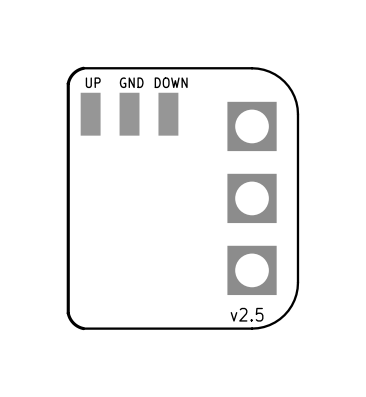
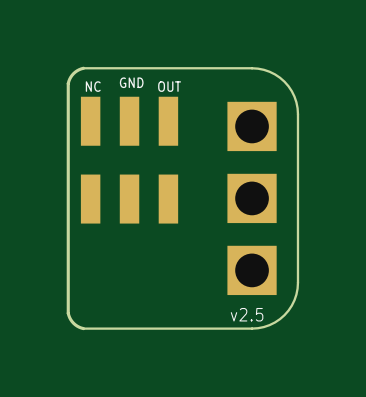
text: UP (93, 82) -> NC (93, 86)
text: DOWN (171, 82) -> OUT (169, 86)
part: (129, 114) -> none
part: none -> (129, 160)

